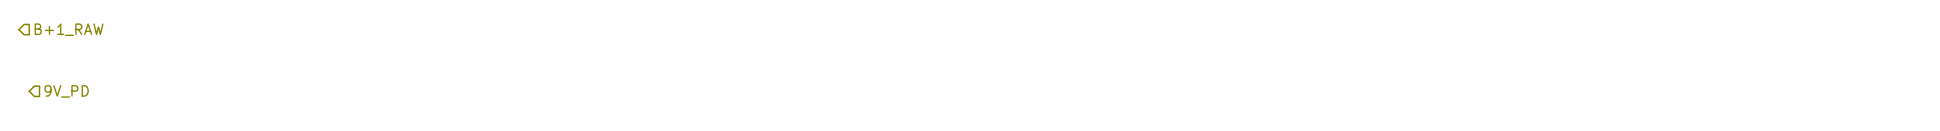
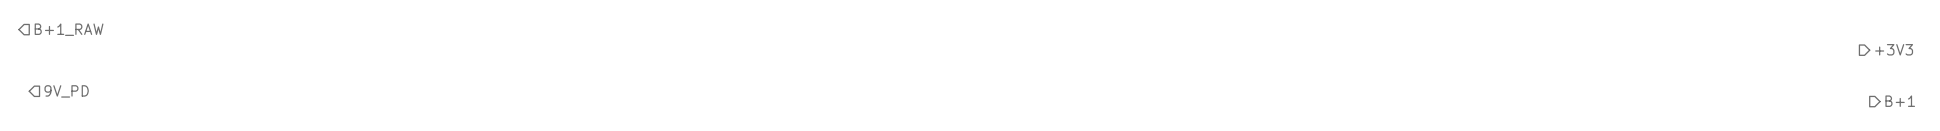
hierarchical label: none -> +3V3 (1894, 49)
hierarchical label: none -> B+1 (1900, 101)

